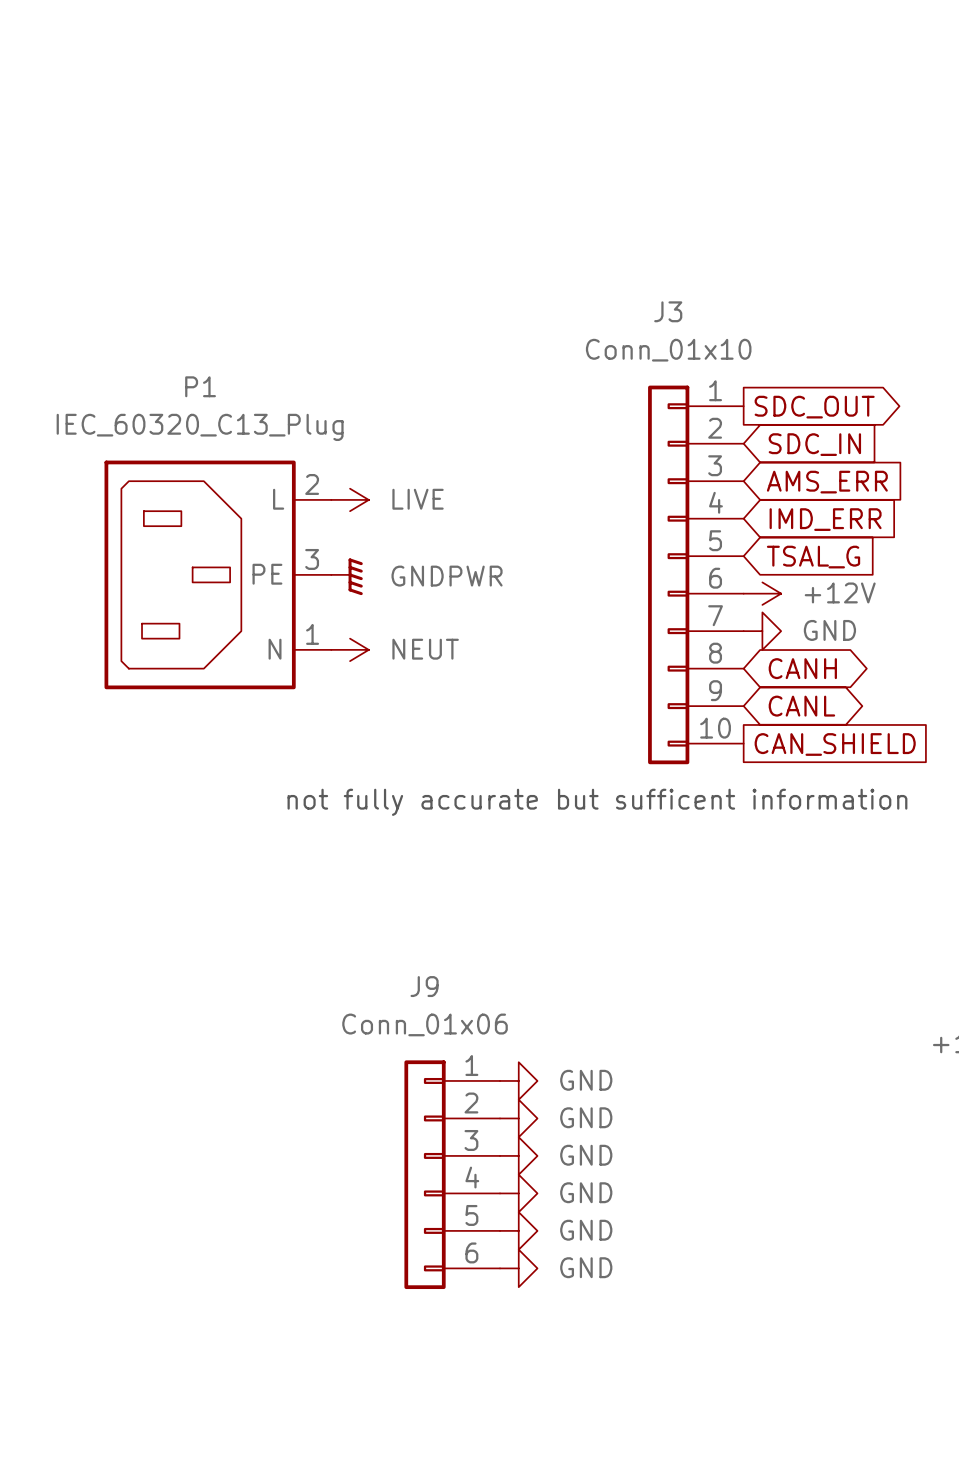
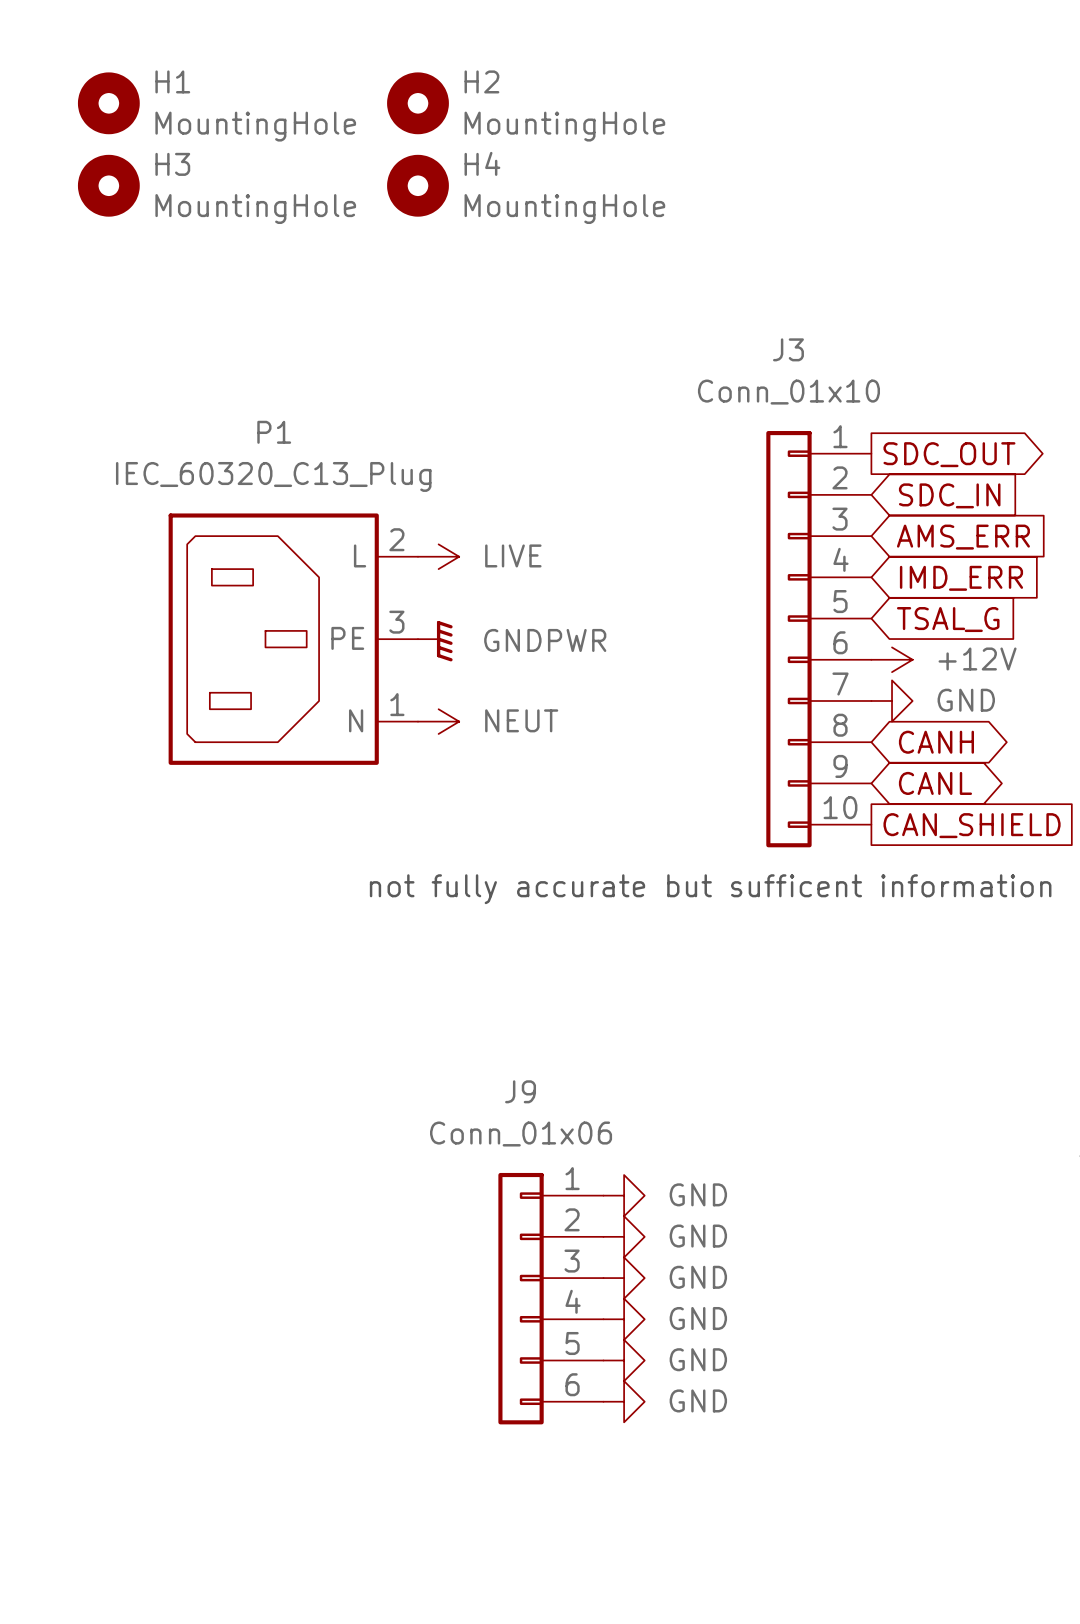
H1: none -> MountingHole (108, 103)
H2: none -> MountingHole (417, 103)
H3: none -> MountingHole (108, 185)
H4: none -> MountingHole (417, 185)

